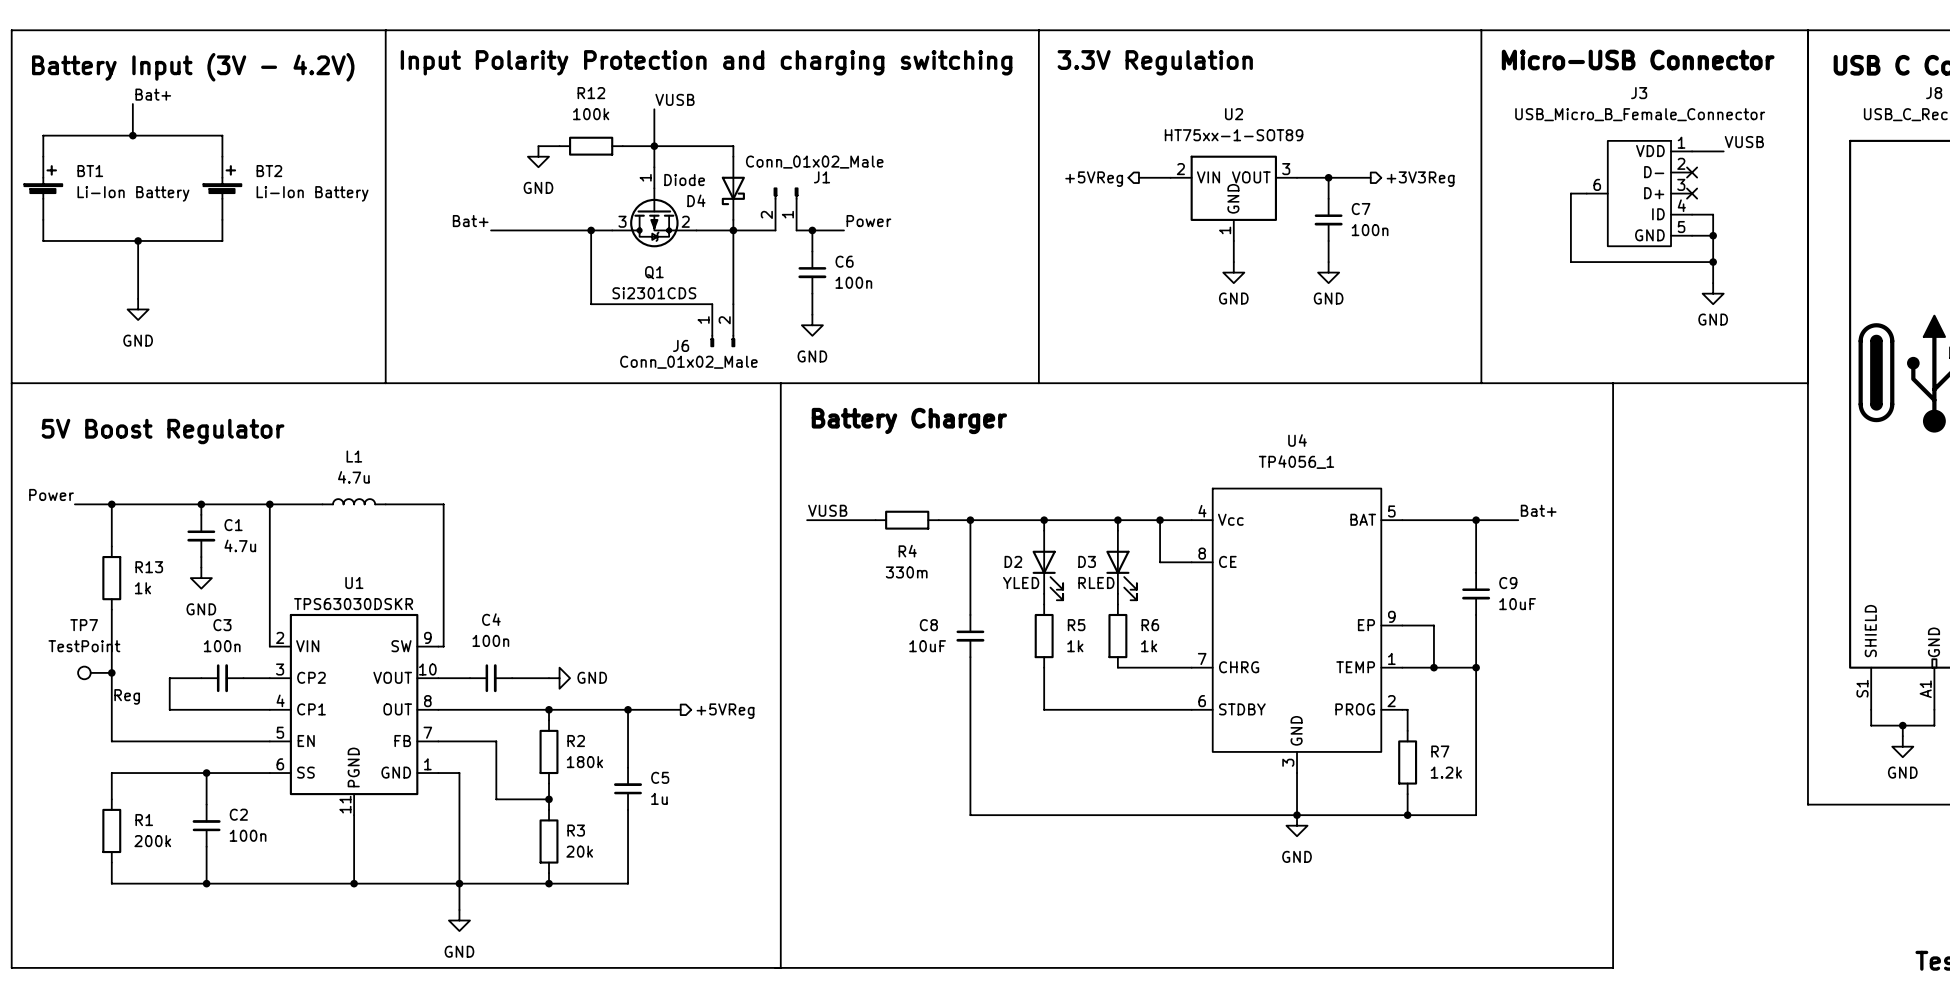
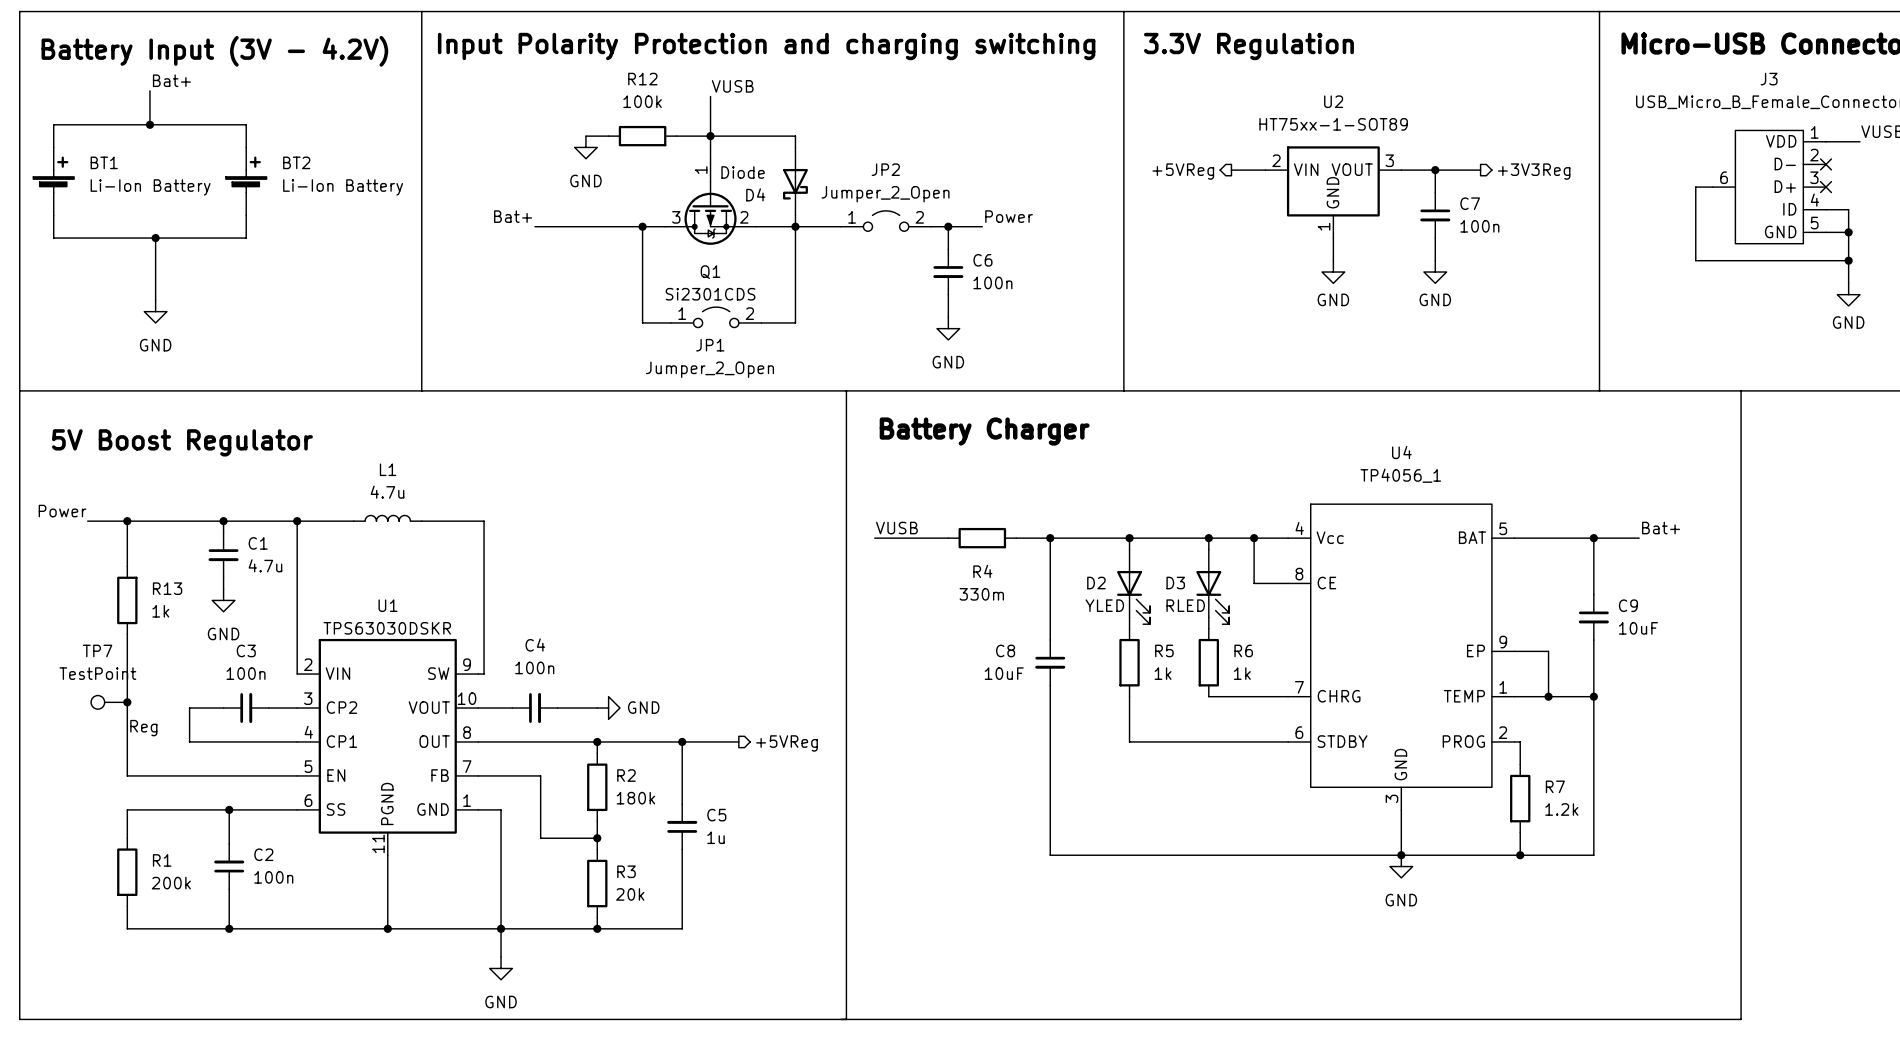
J1: Conn_01x02_Male (786, 209) -> none
label position: Power (868, 221) -> Power (1009, 216)
JP2: none -> Jumper_2_Open (886, 221)
wire: (796, 230) (843, 230) -> (931, 226) (982, 226)
wire: (812, 230) (812, 251) -> (948, 226) (948, 249)
junction: (812, 230) -> none
junction: none -> (948, 226)
C6 position: (812, 272) -> (948, 272)
wire: (812, 293) (812, 314) -> (948, 294) (948, 317)
wire: (591, 304) (712, 304) -> (642, 305) (642, 322) (670, 322)
JP1: none -> Jumper_2_Open (716, 317)
J6: Conn_01x02_Male (722, 325) -> none
power symbol position: GND (812, 325) -> GND (948, 328)

